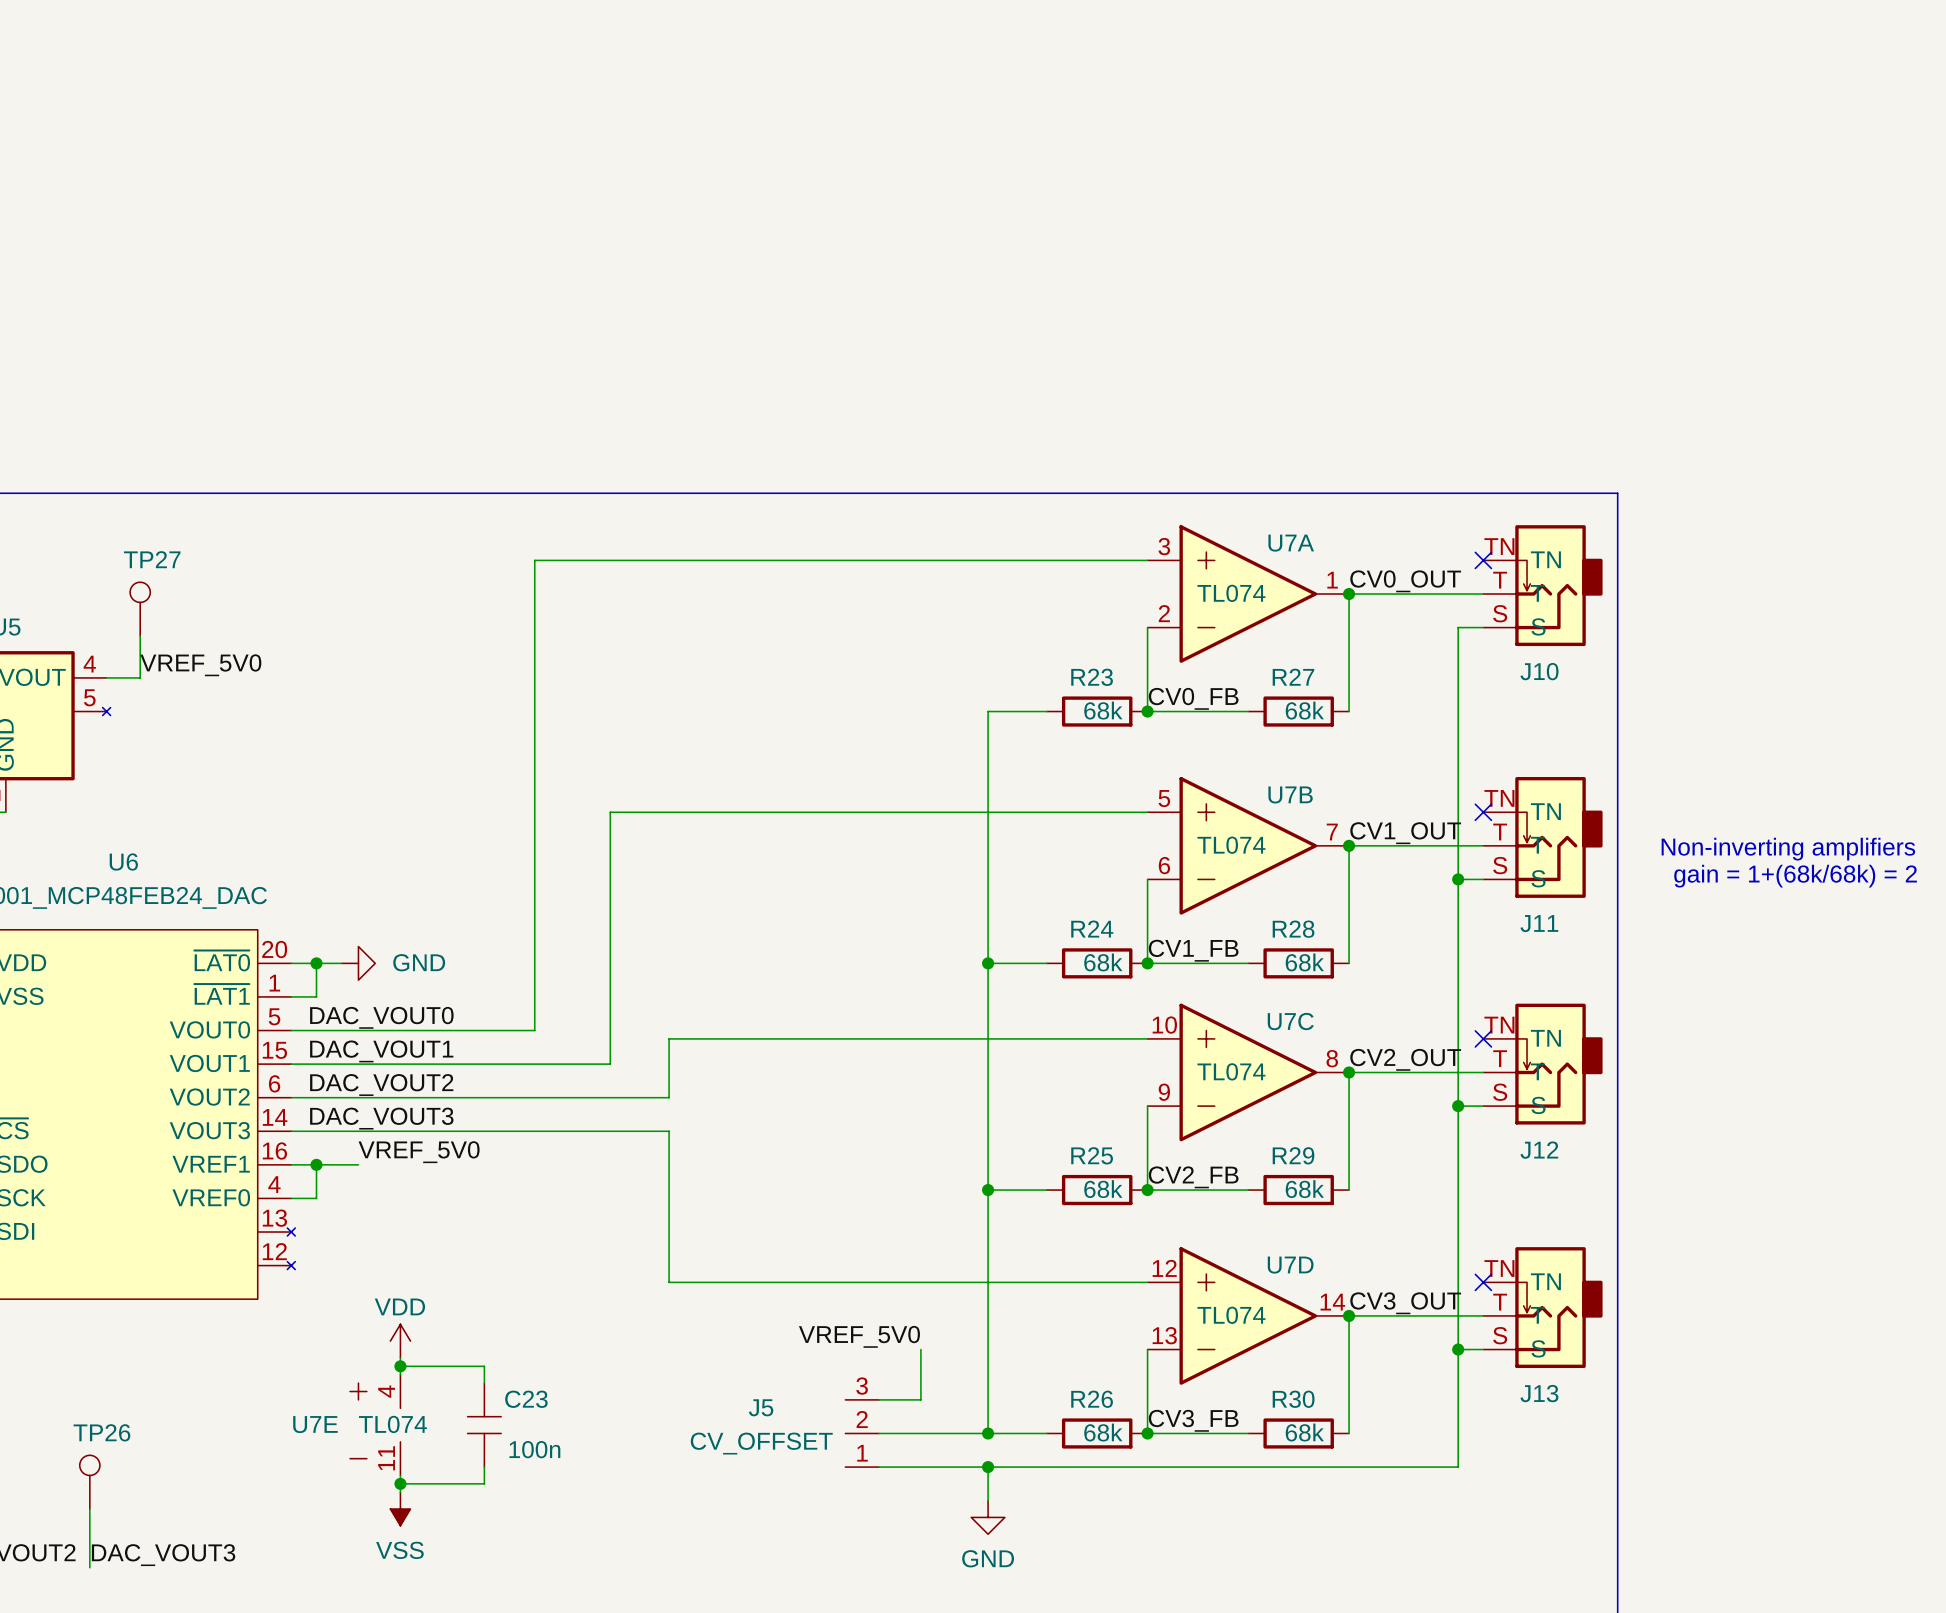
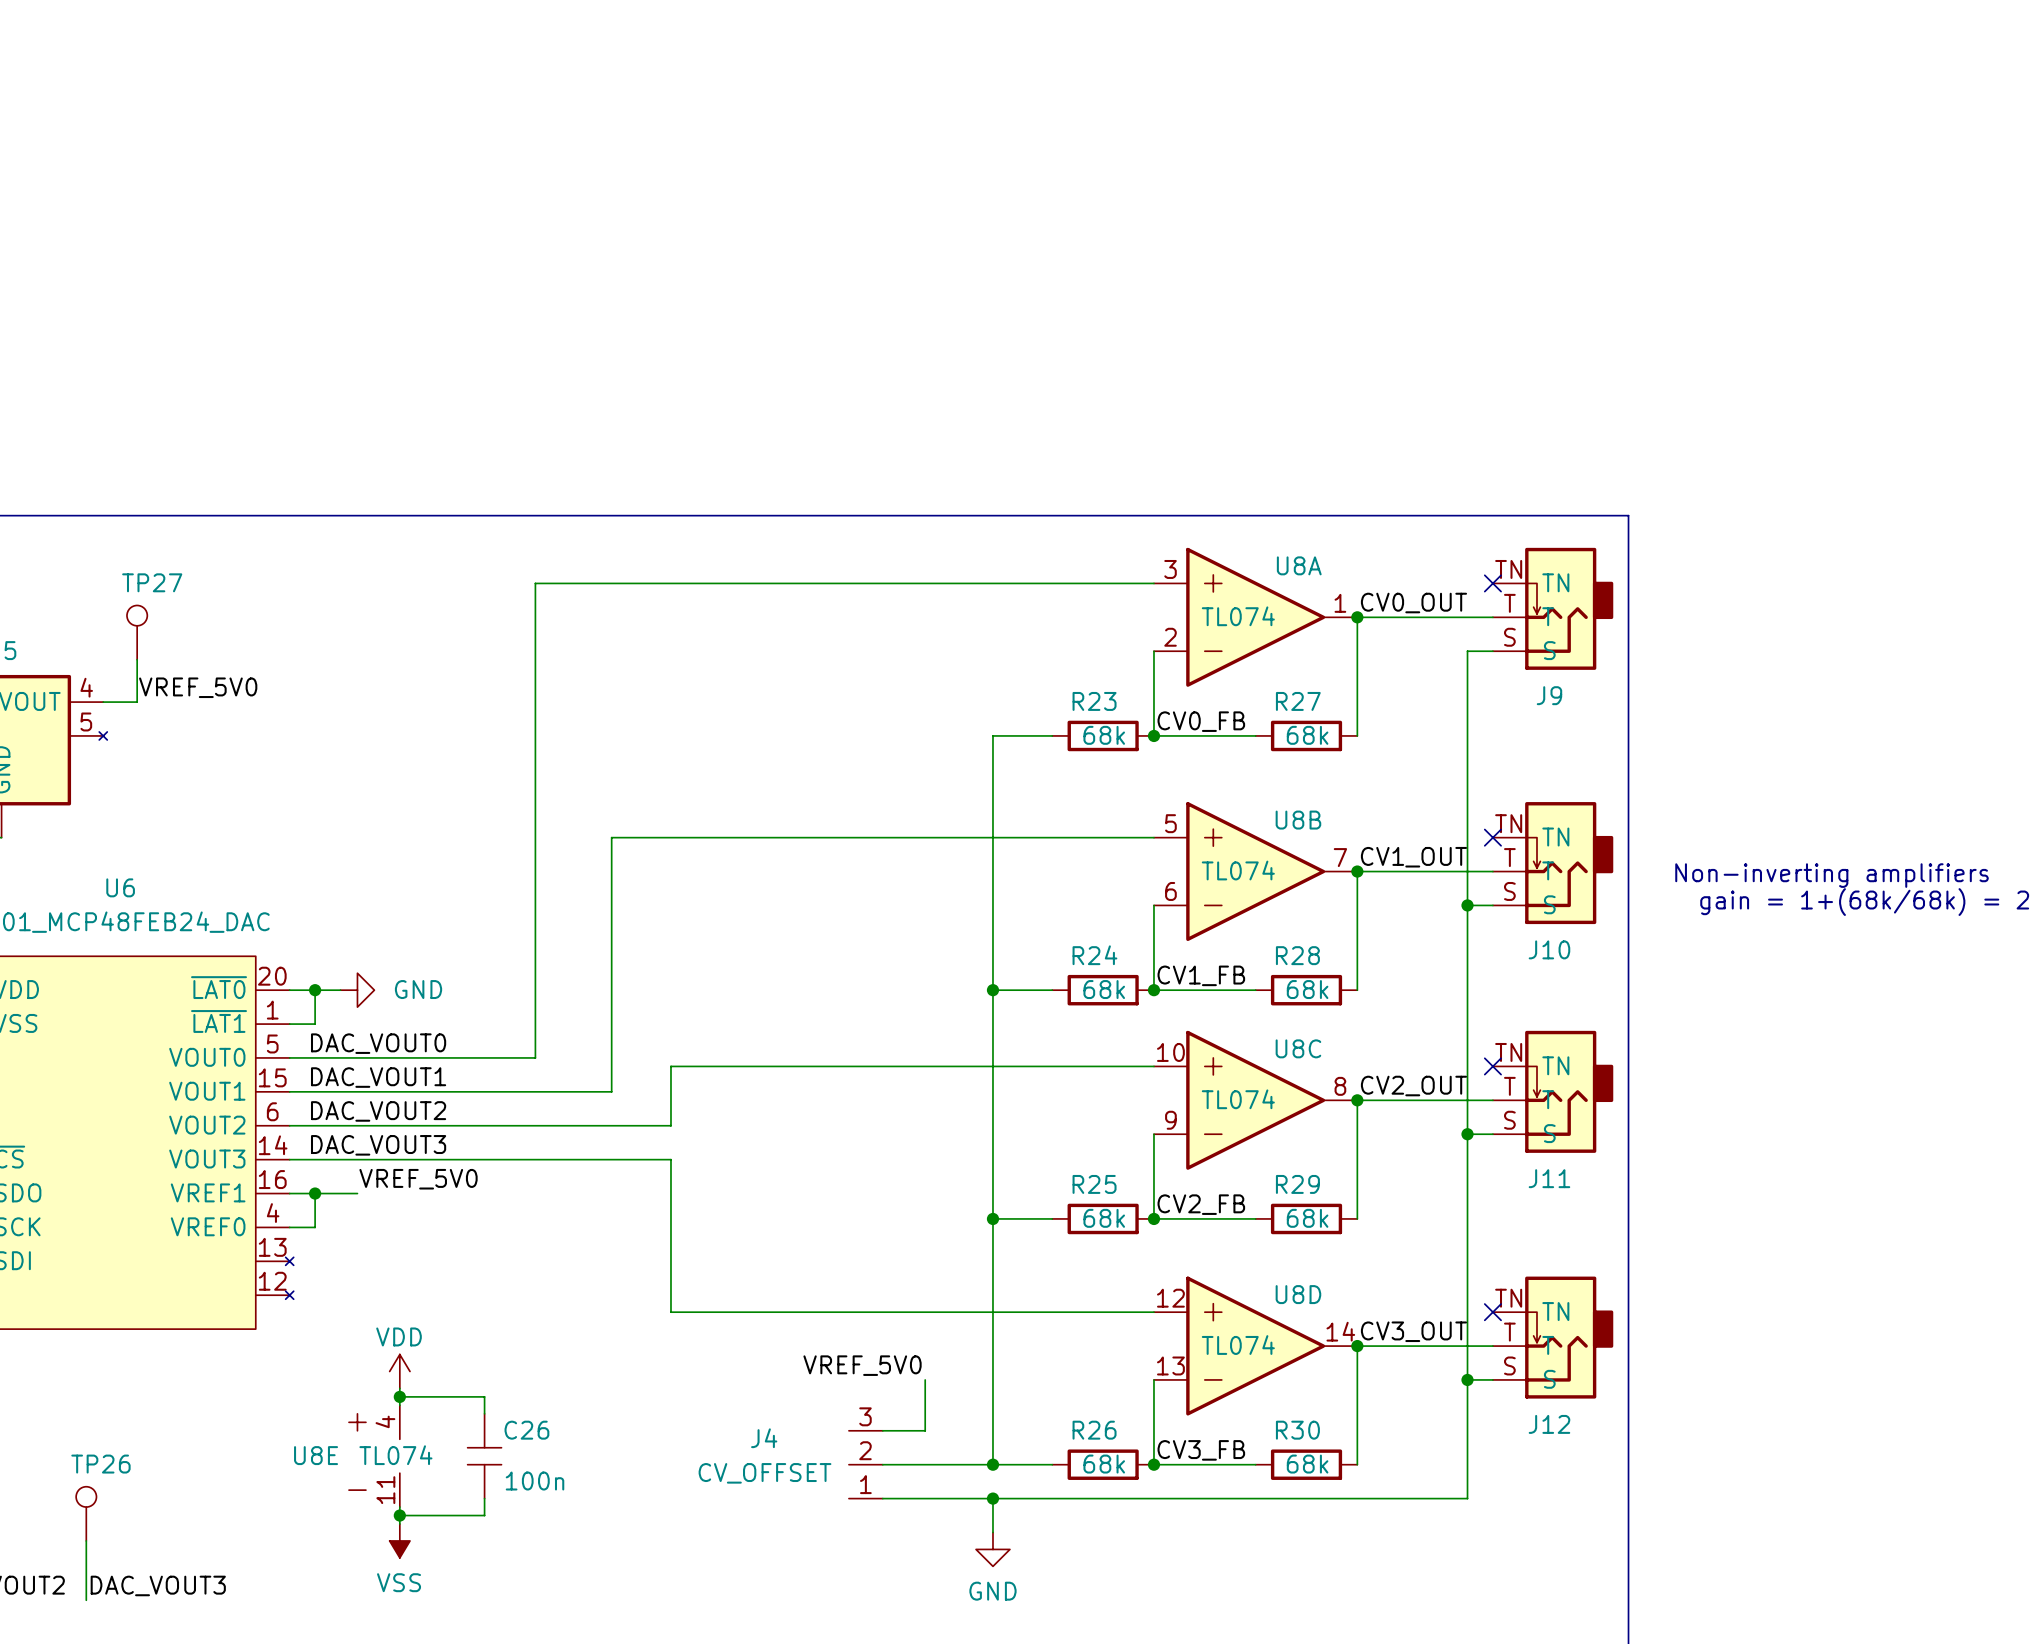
U7A name: U7A (1291, 543) -> U8A (1299, 565)
J10 name: J10 (1539, 671) -> J9 (1549, 695)
U7B name: U7B (1290, 794) -> U8B (1298, 820)
J11 name: J11 (1539, 923) -> J10 (1549, 949)
U7C name: U7C (1290, 1021) -> U8C (1298, 1048)
J12 name: J12 (1539, 1150) -> J11 (1549, 1178)
U7D name: U7D (1290, 1265) -> U8D (1298, 1294)
J13 name: J13 (1539, 1393) -> J12 (1549, 1424)
C23 name: C23 (526, 1399) -> C26 (526, 1430)
J5 name: J5 (761, 1407) -> J4 (764, 1438)
U7E name: U7E (315, 1424) -> U8E (316, 1455)

